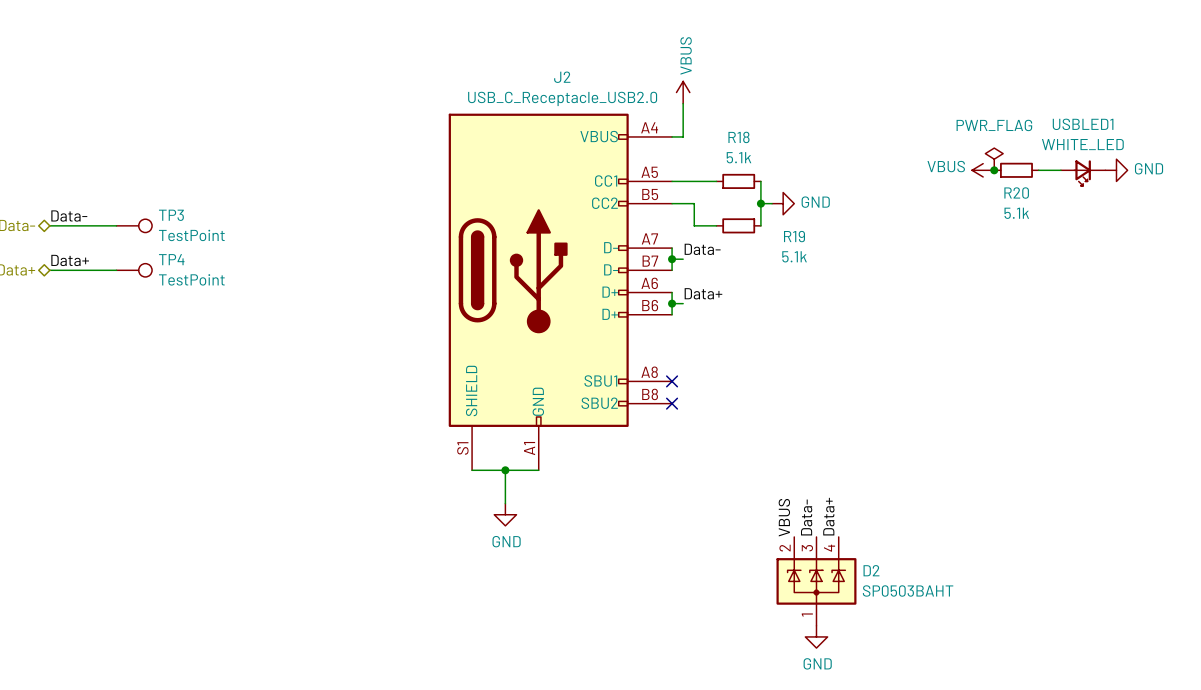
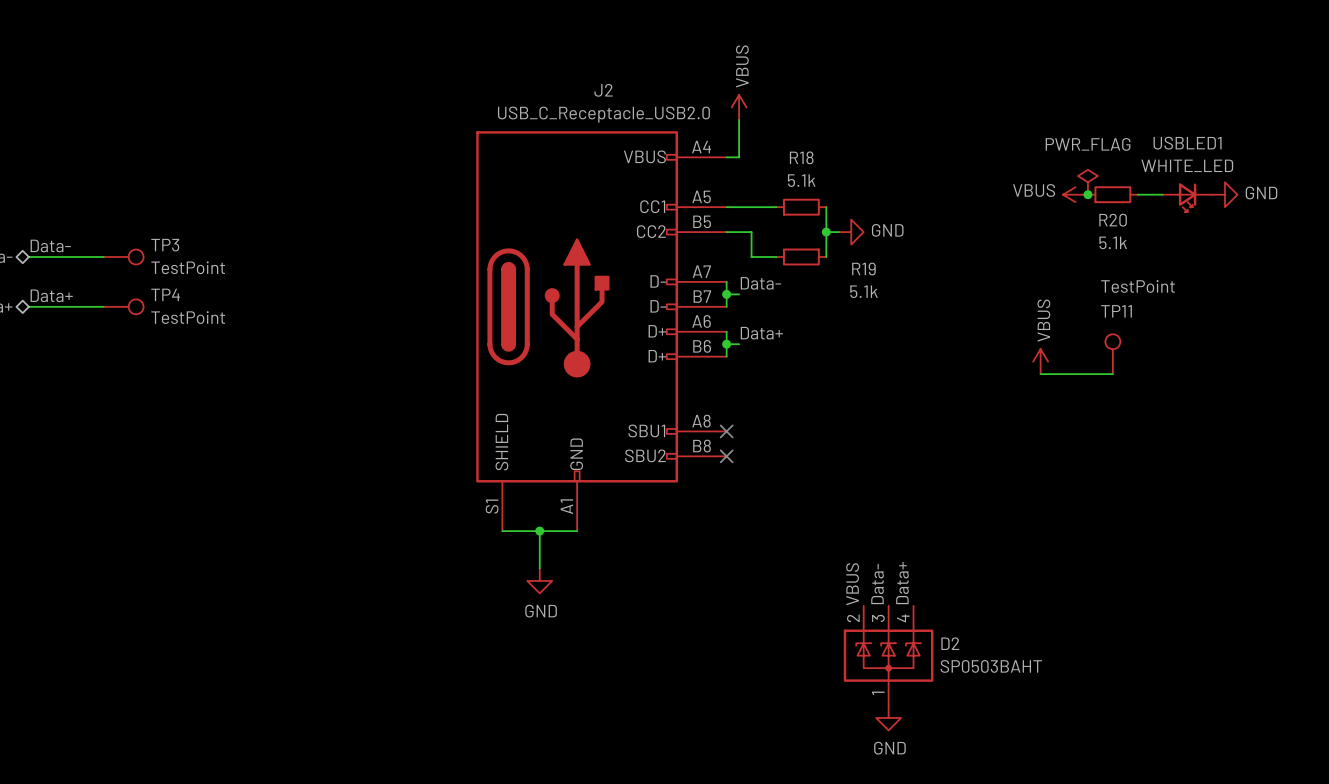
TP11: none -> TestPoint (1112, 354)
power symbol: none -> VBUS (1040, 361)
wire: none -> (1040, 374) (1112, 374)

